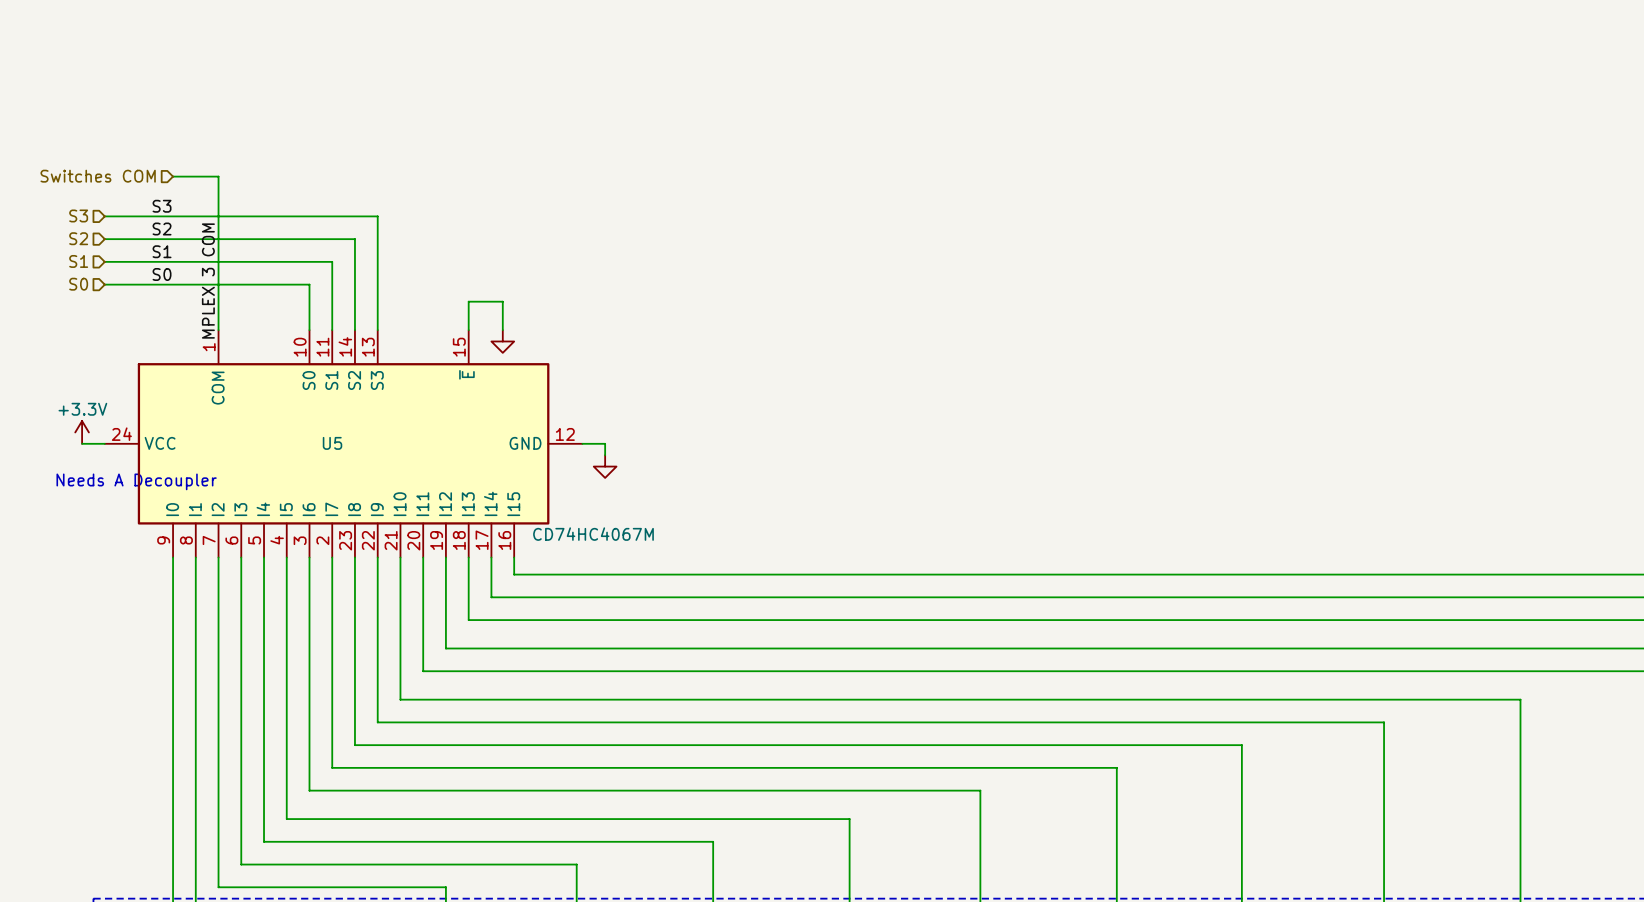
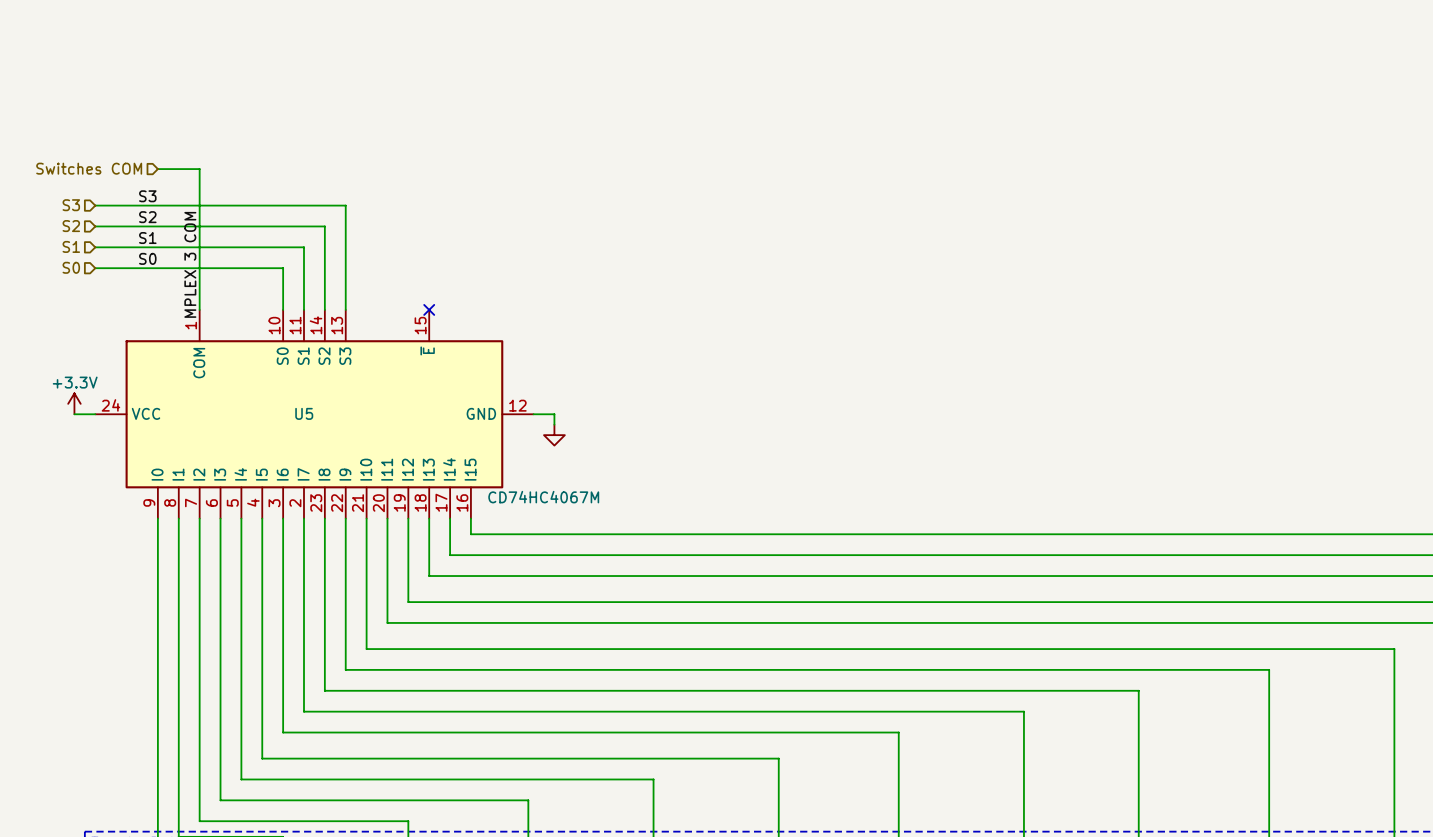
wire: (468, 330) (468, 301) (502, 301) (502, 330) -> none
no-connect mark: none -> (429, 309)
power symbol: (502, 341) -> none
text: Needs A Decoupler (136, 481) -> none

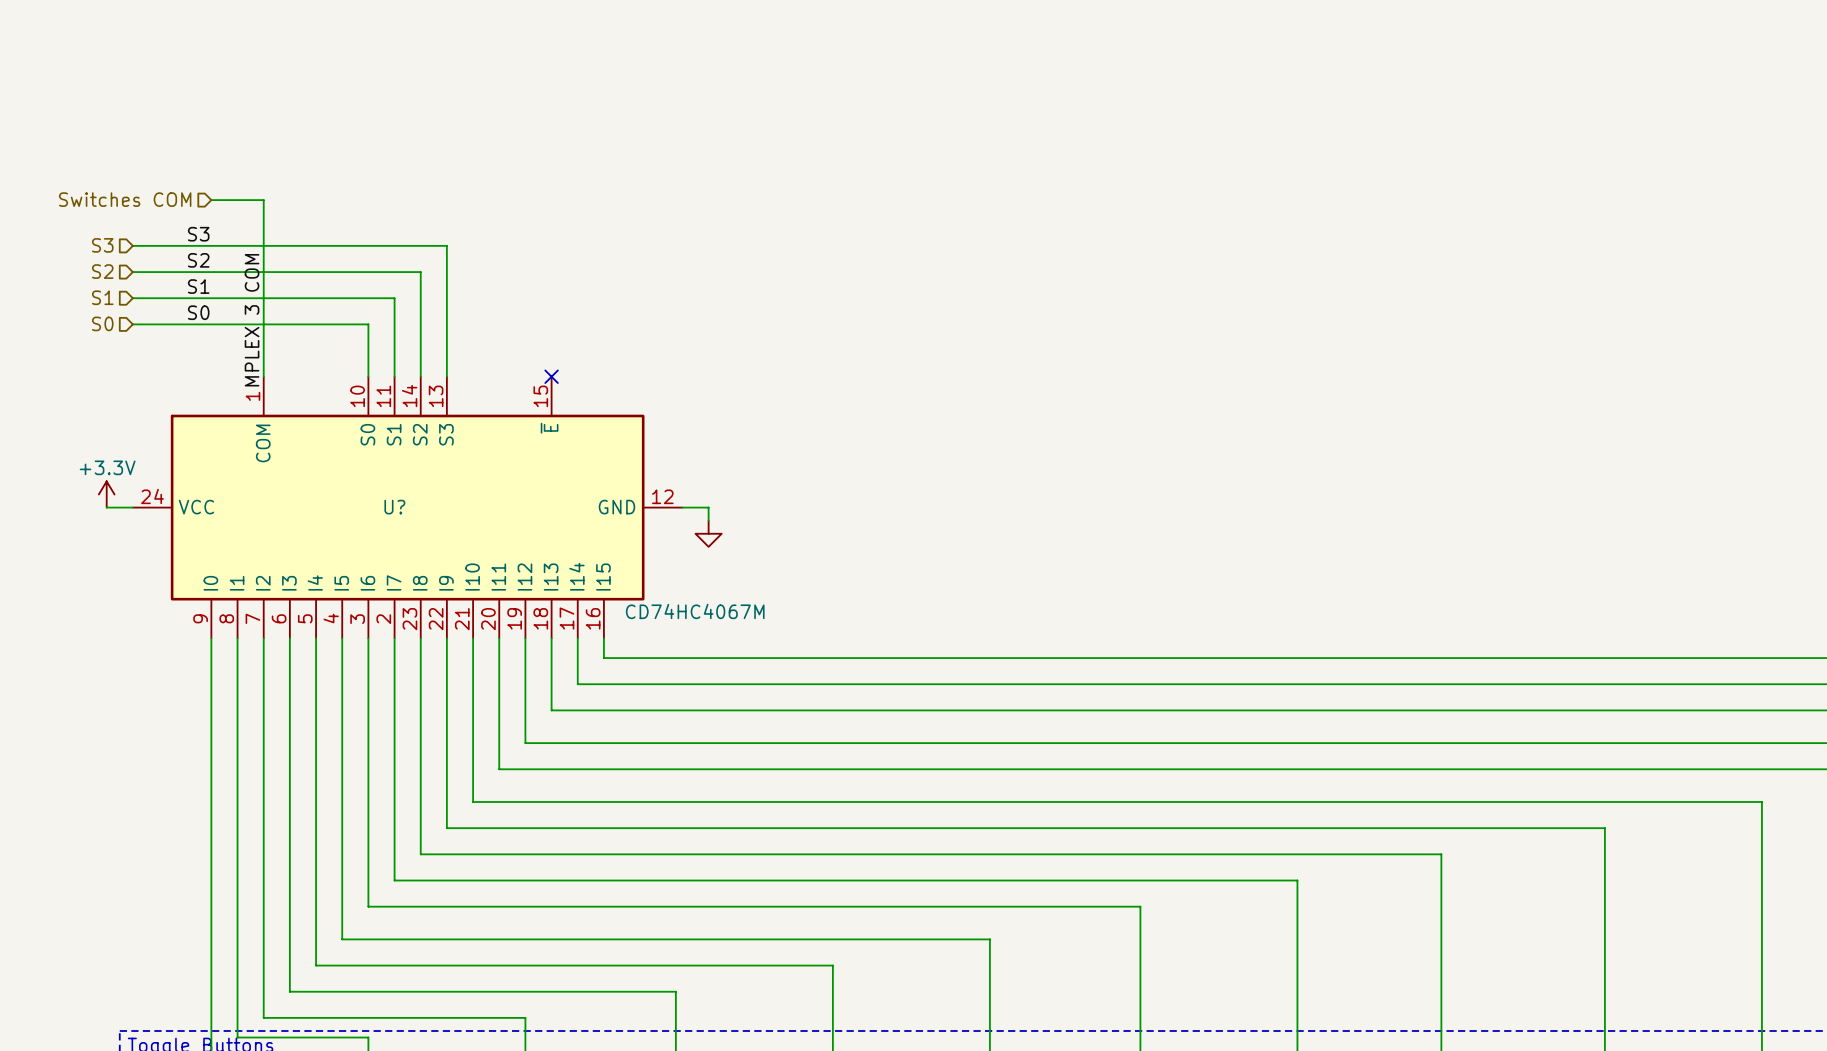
U5 name: U5 (304, 413) -> U? (394, 507)

